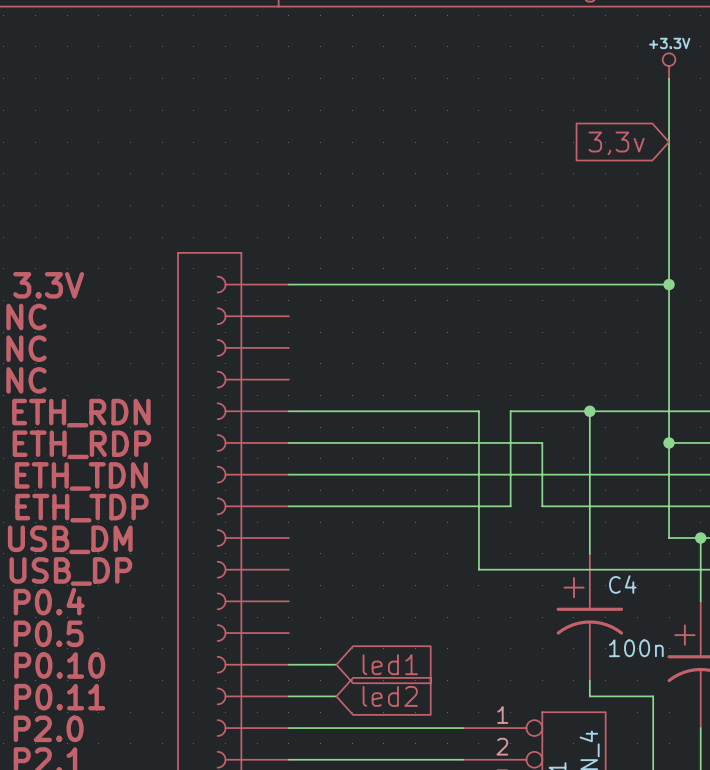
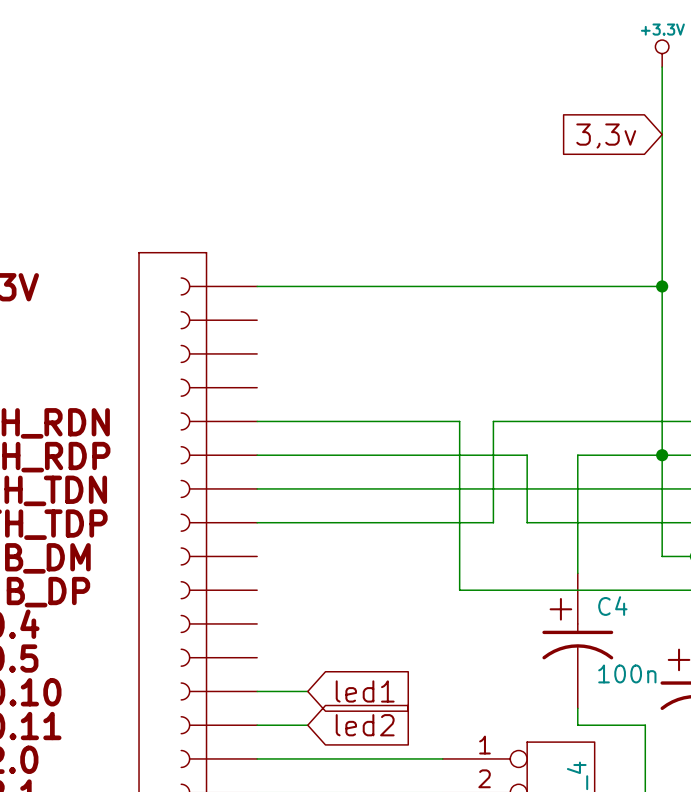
wire: (589, 411) (589, 442) -> (662, 455) (577, 455)
junction: (589, 411) -> none

